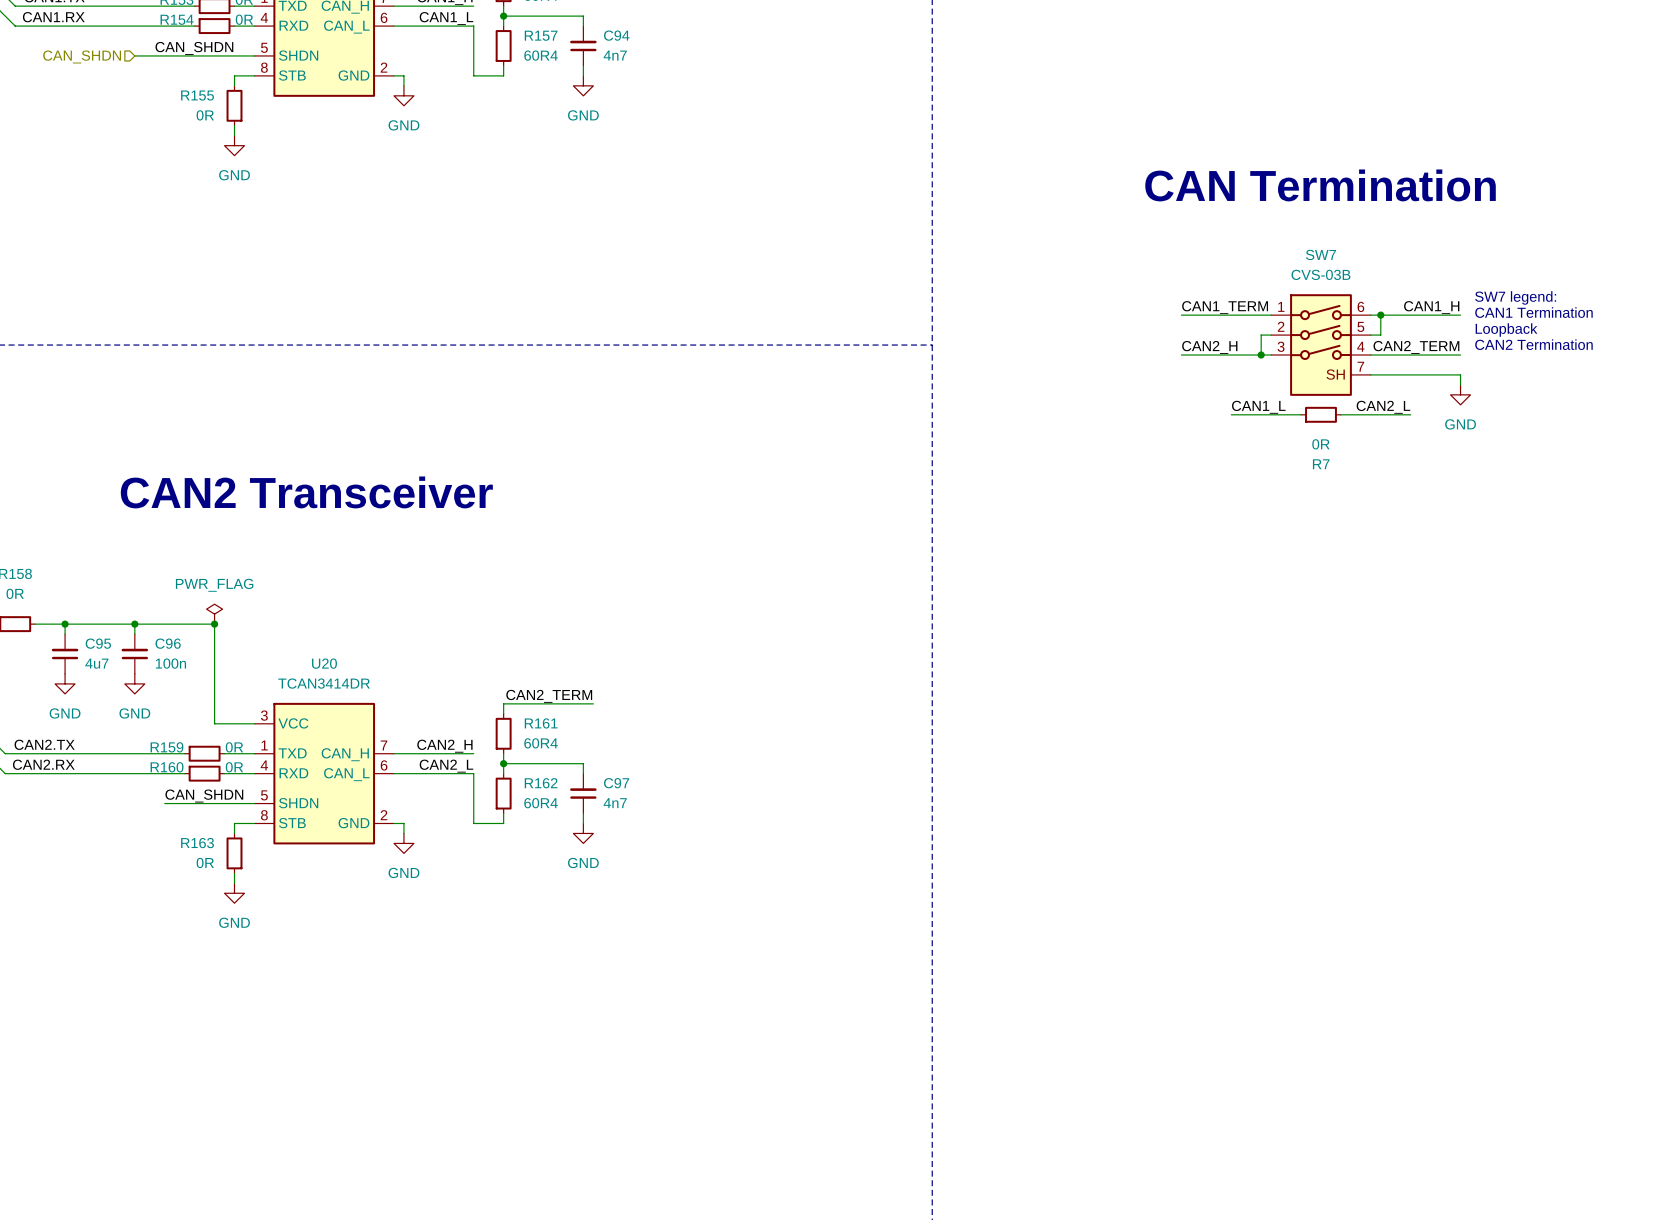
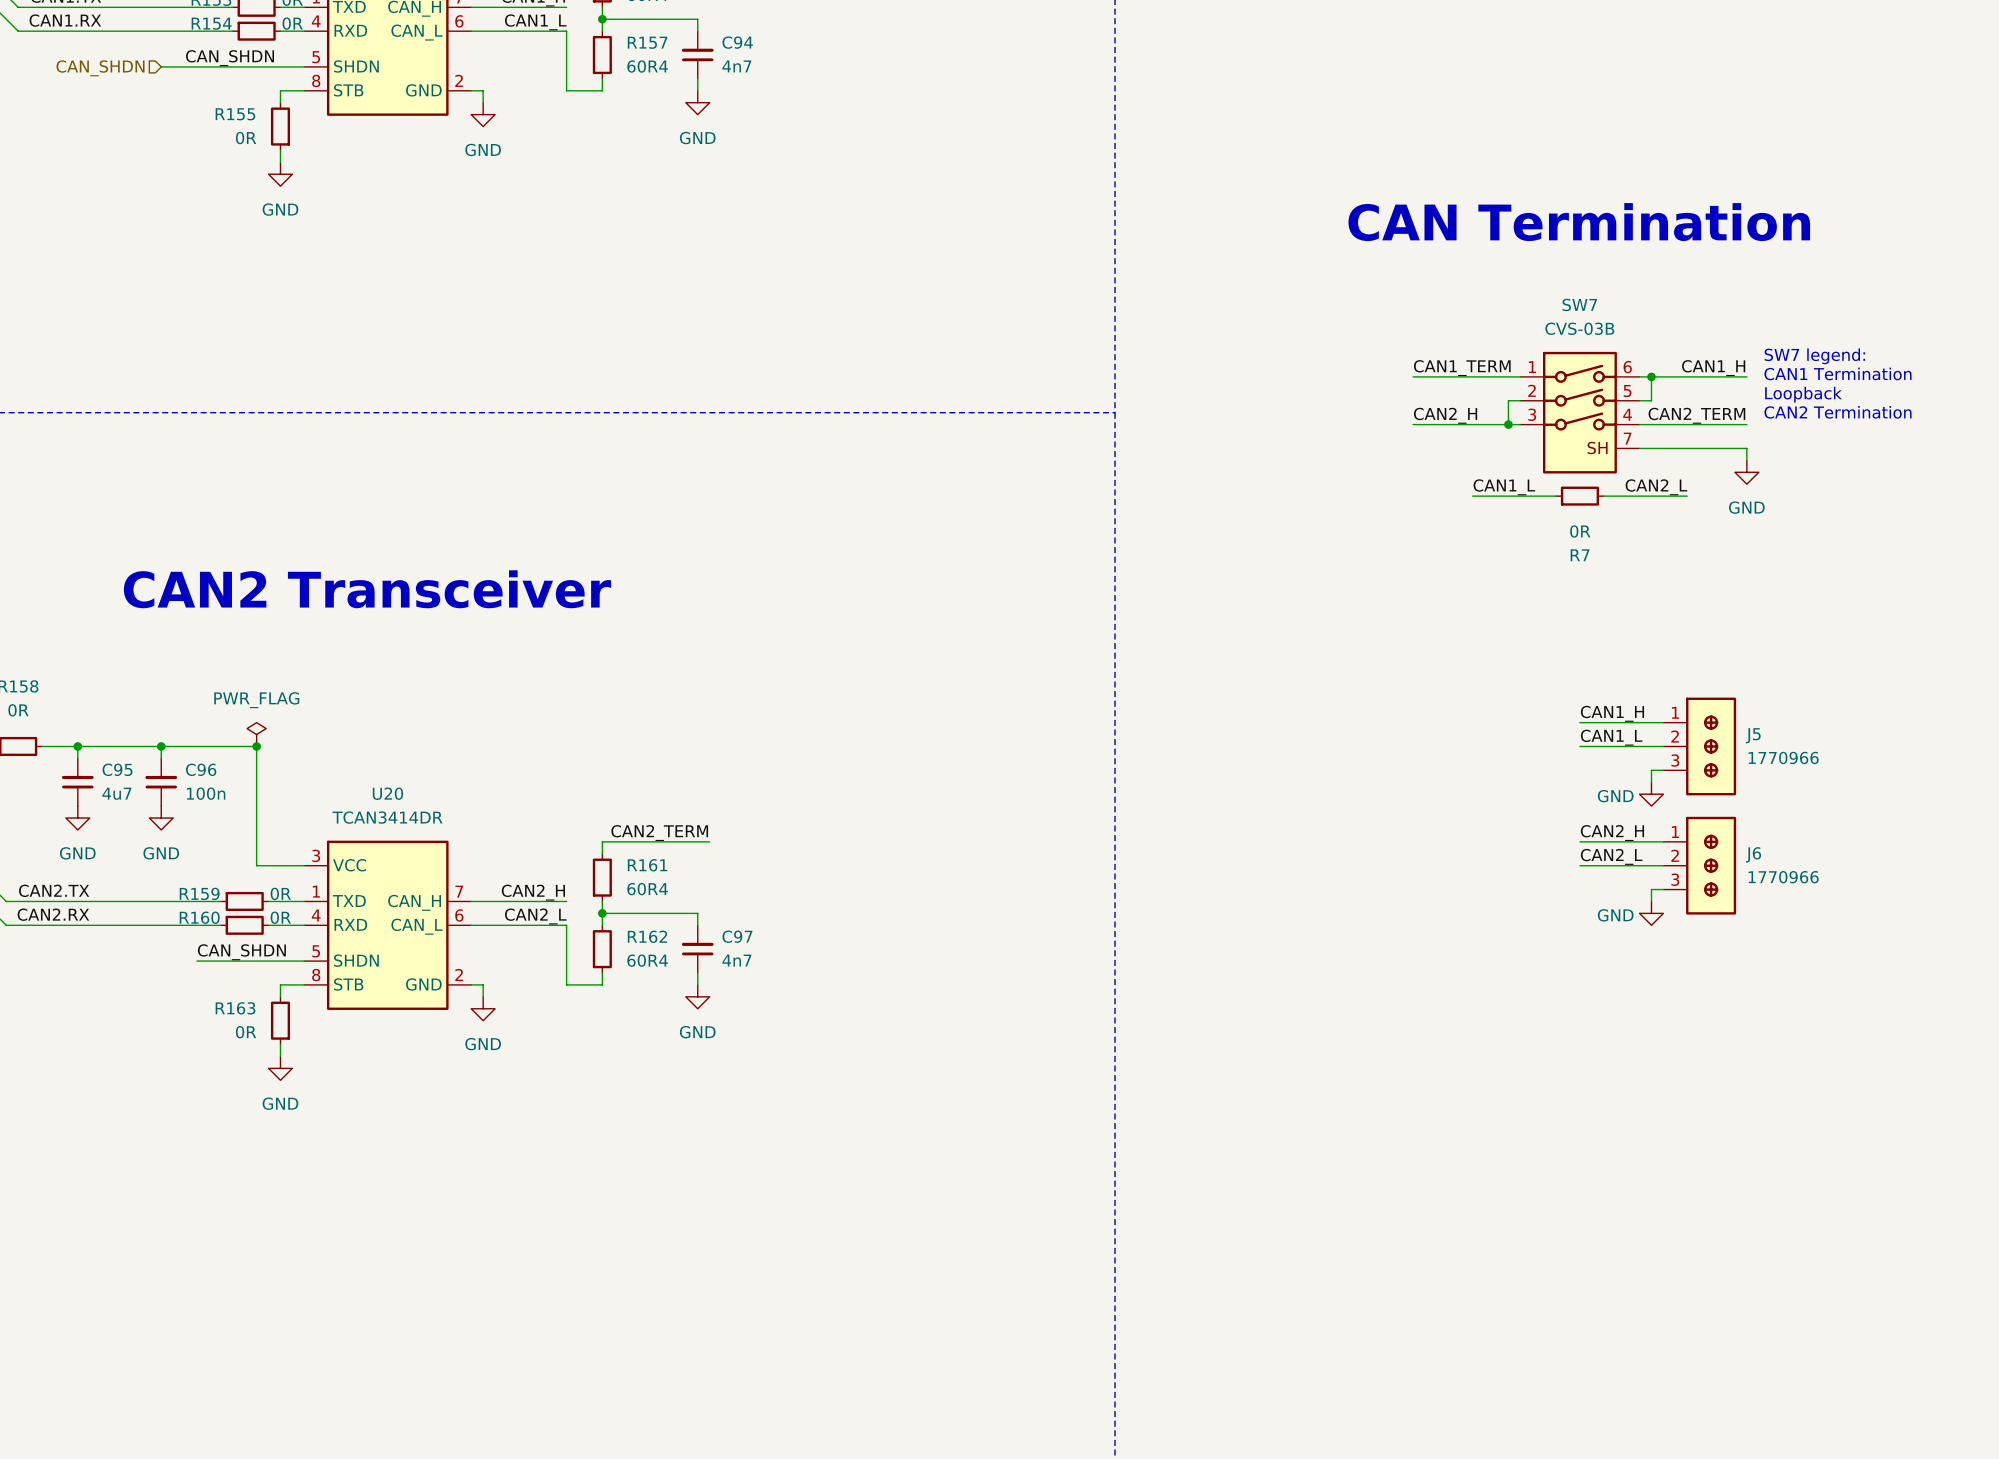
label: none -> CAN1_H (1612, 713)
wire: none -> (1579, 722) (1663, 722)
label: none -> CAN1_L (1611, 737)
wire: none -> (1579, 746) (1663, 746)
J5: none -> (1699, 746)
wire: none -> (1663, 770) (1651, 770) (1651, 782)
power symbol: none -> GND (1651, 794)
label: none -> CAN2_H (1612, 833)
wire: none -> (1579, 841) (1663, 841)
label: none -> CAN2_L (1611, 856)
wire: none -> (1579, 865) (1663, 865)
J6: none -> (1699, 865)
wire: none -> (1663, 889) (1651, 889) (1651, 901)
power symbol: none -> GND (1651, 913)

